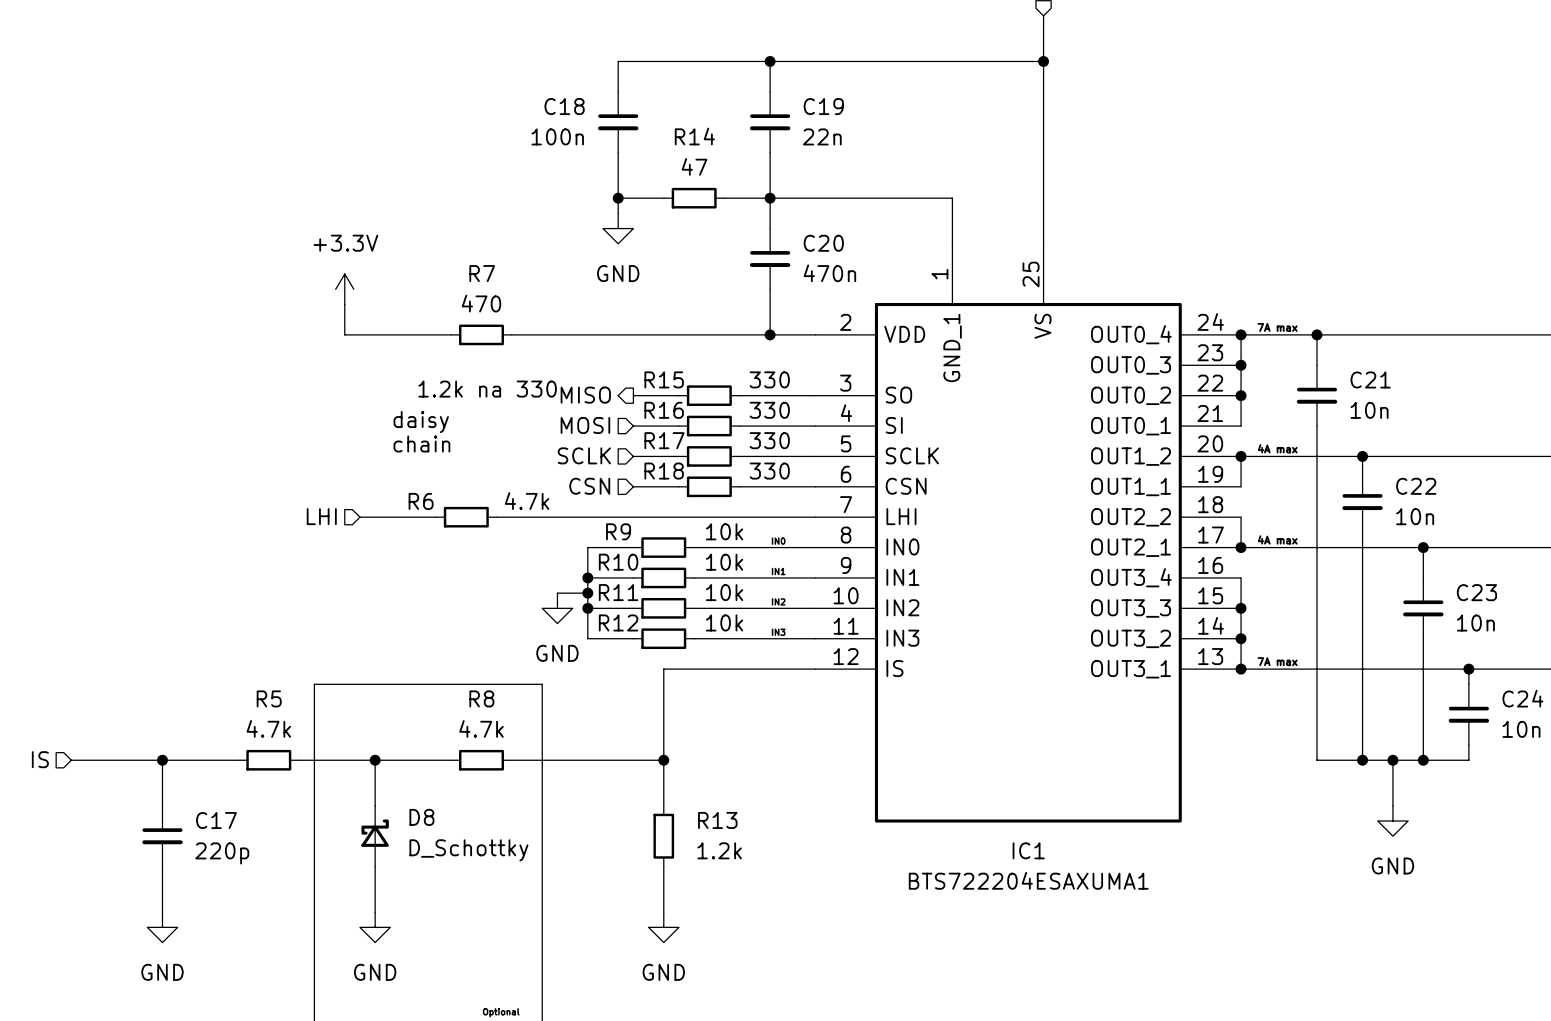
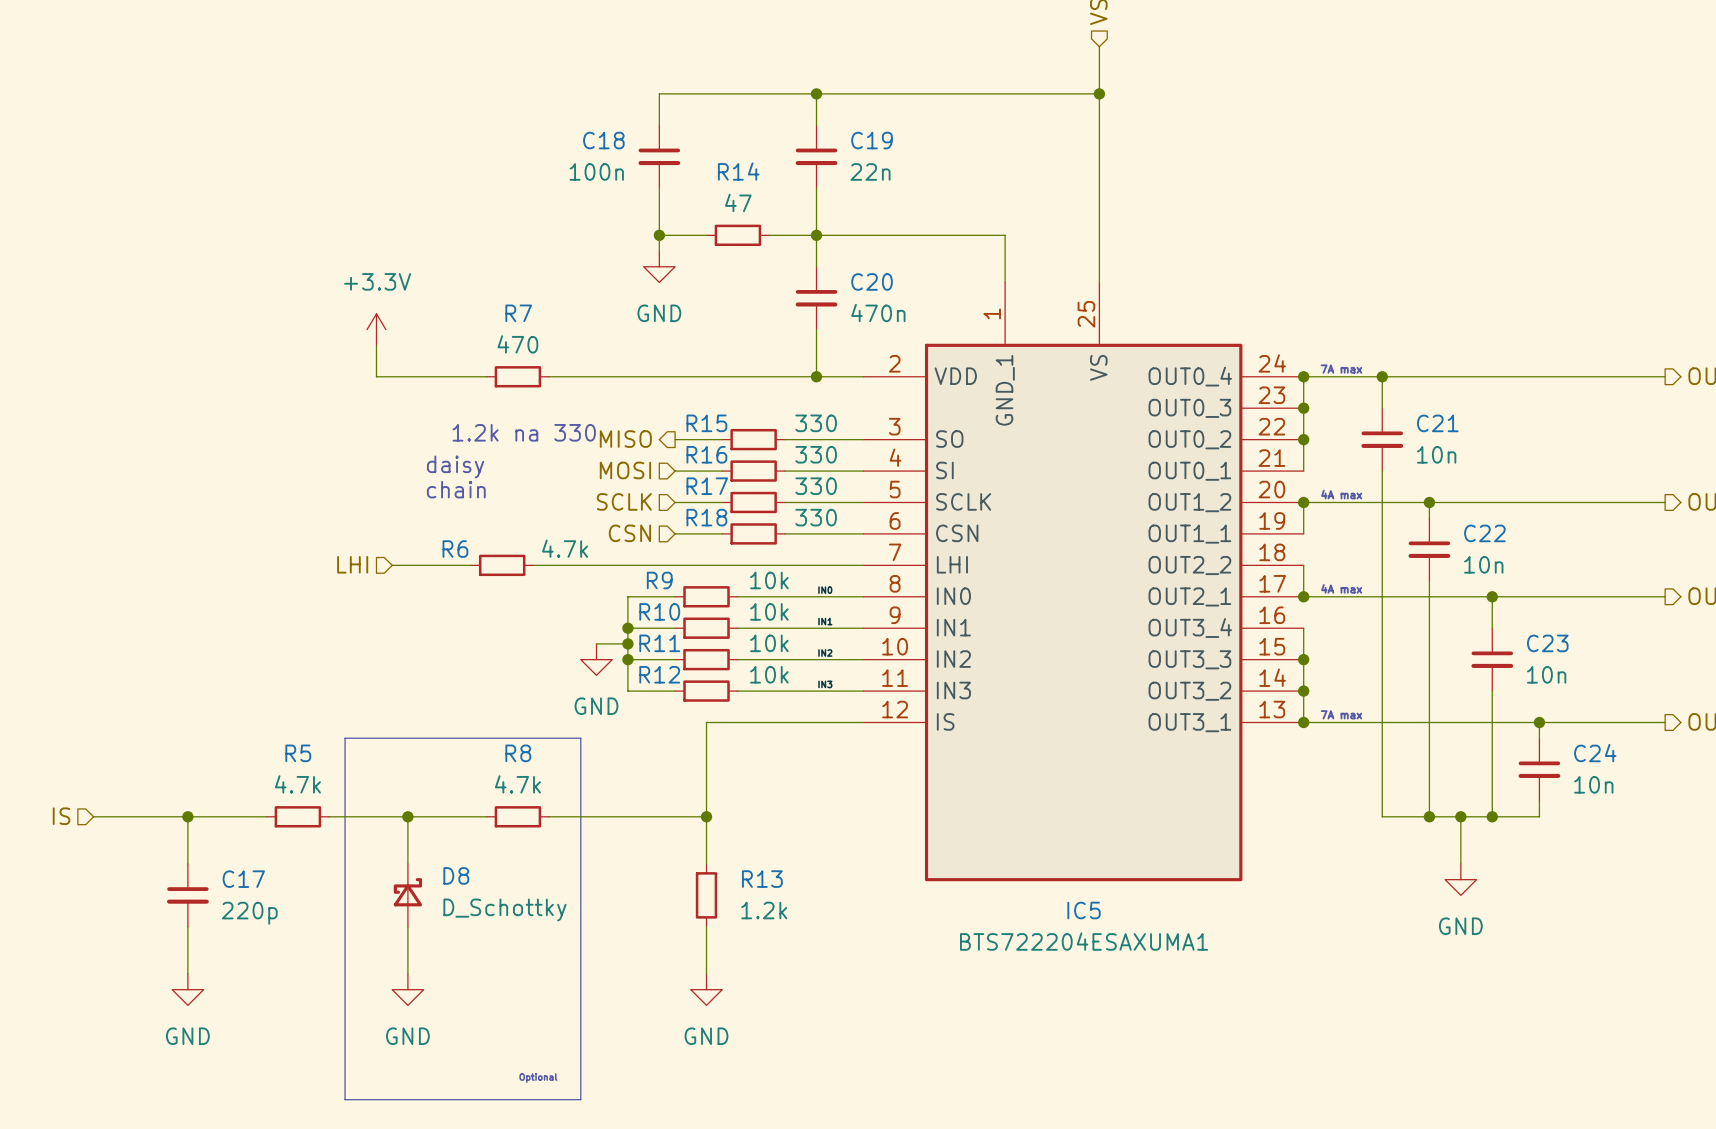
IC1 name: IC1 (1028, 850) -> IC5 (1084, 910)

